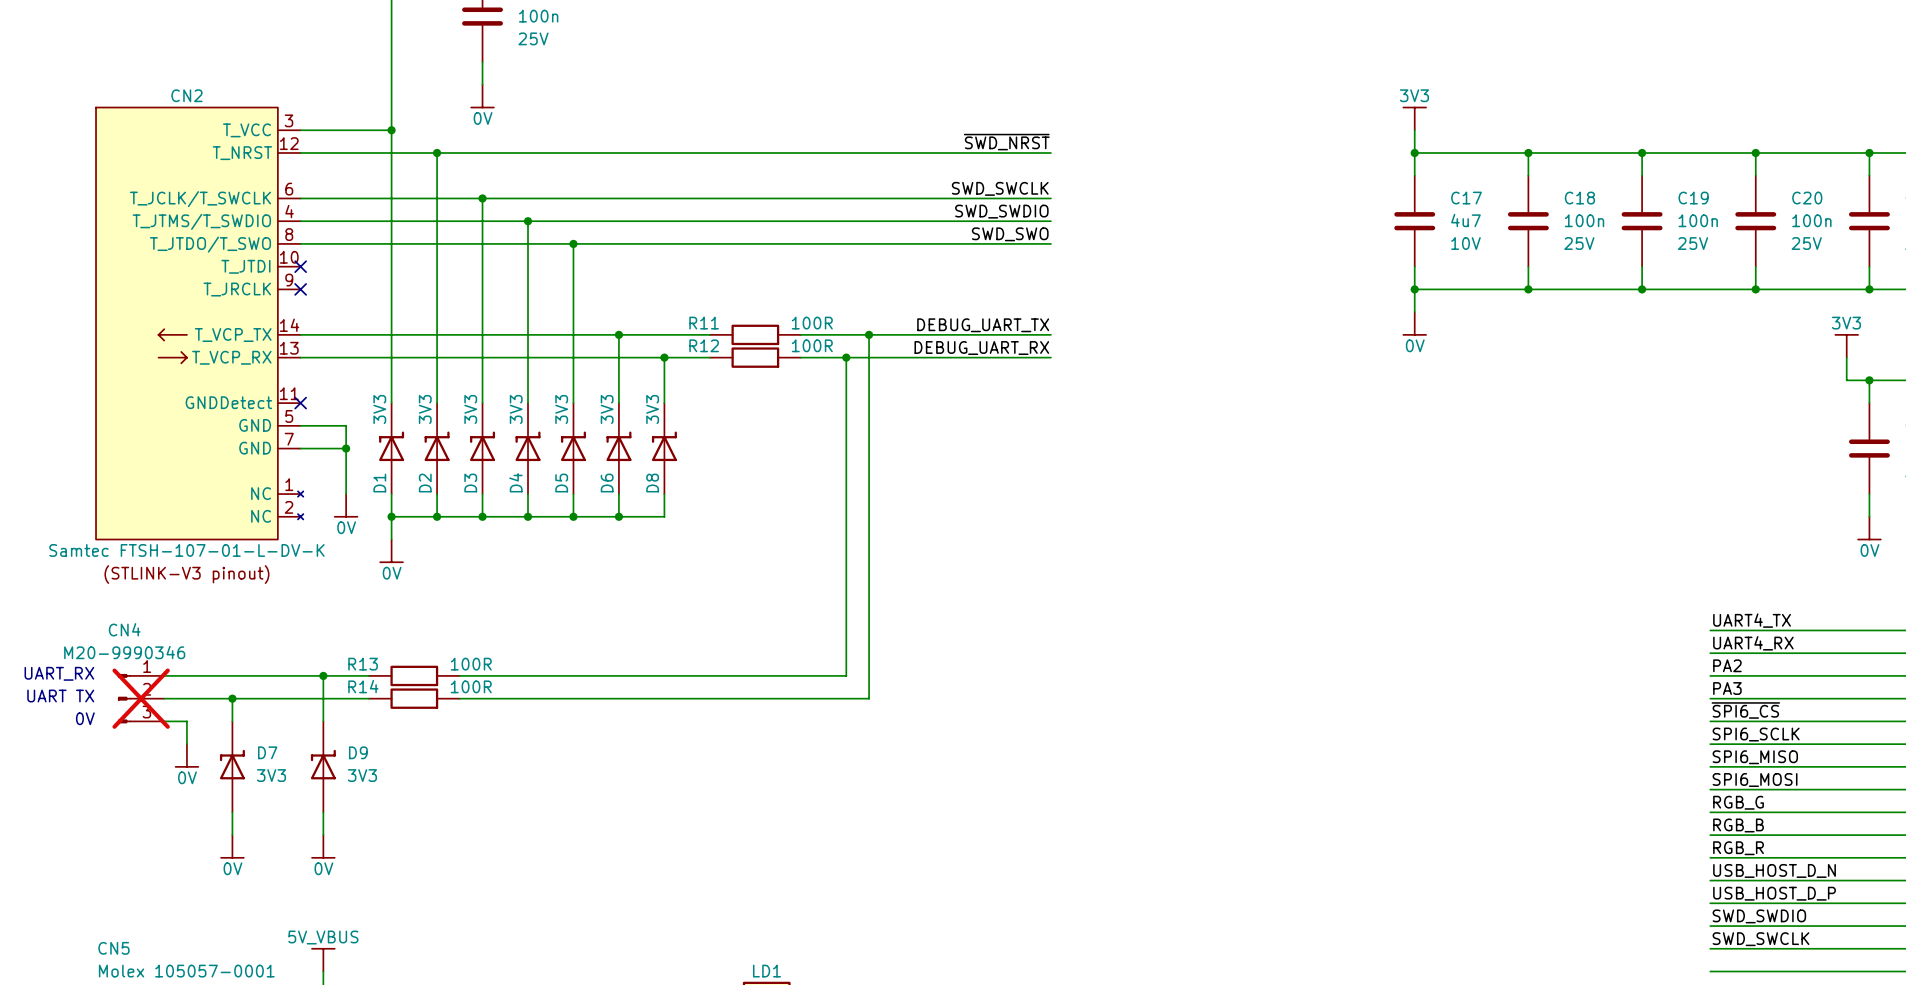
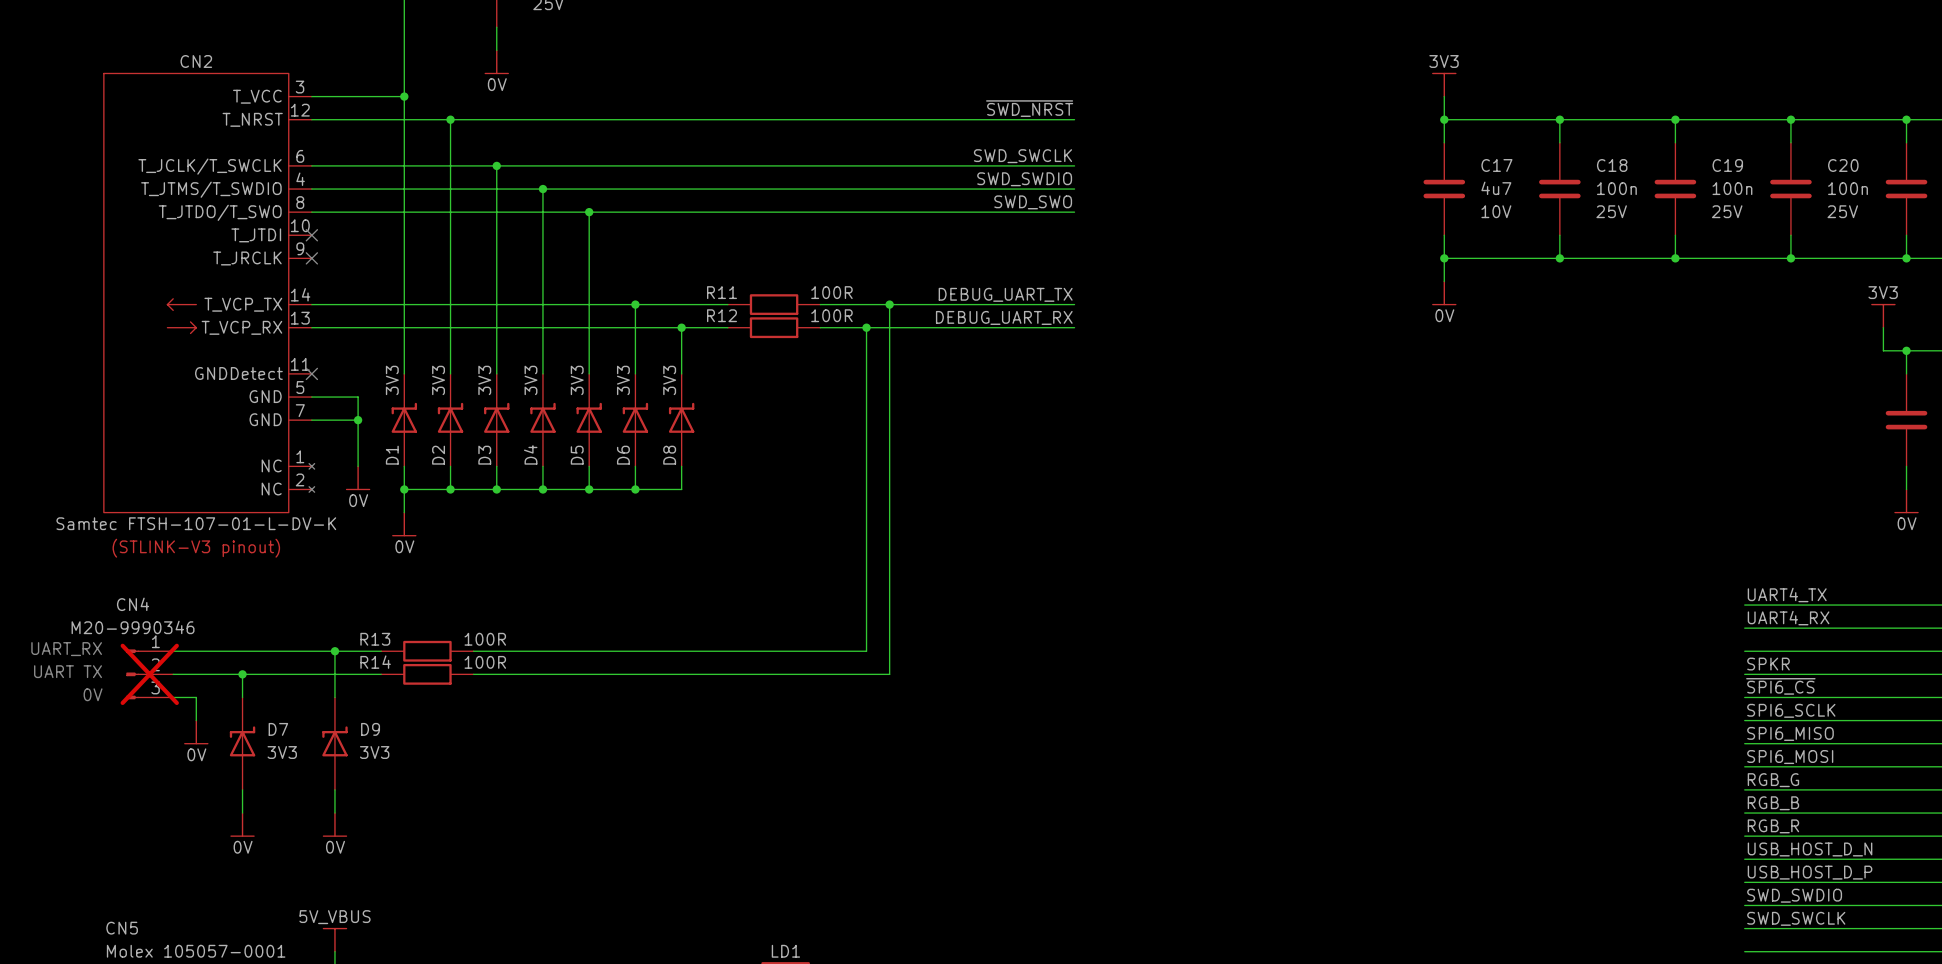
label: PA2 (1727, 665) -> none
label: PA3 (1727, 688) -> SPKR (1768, 664)

